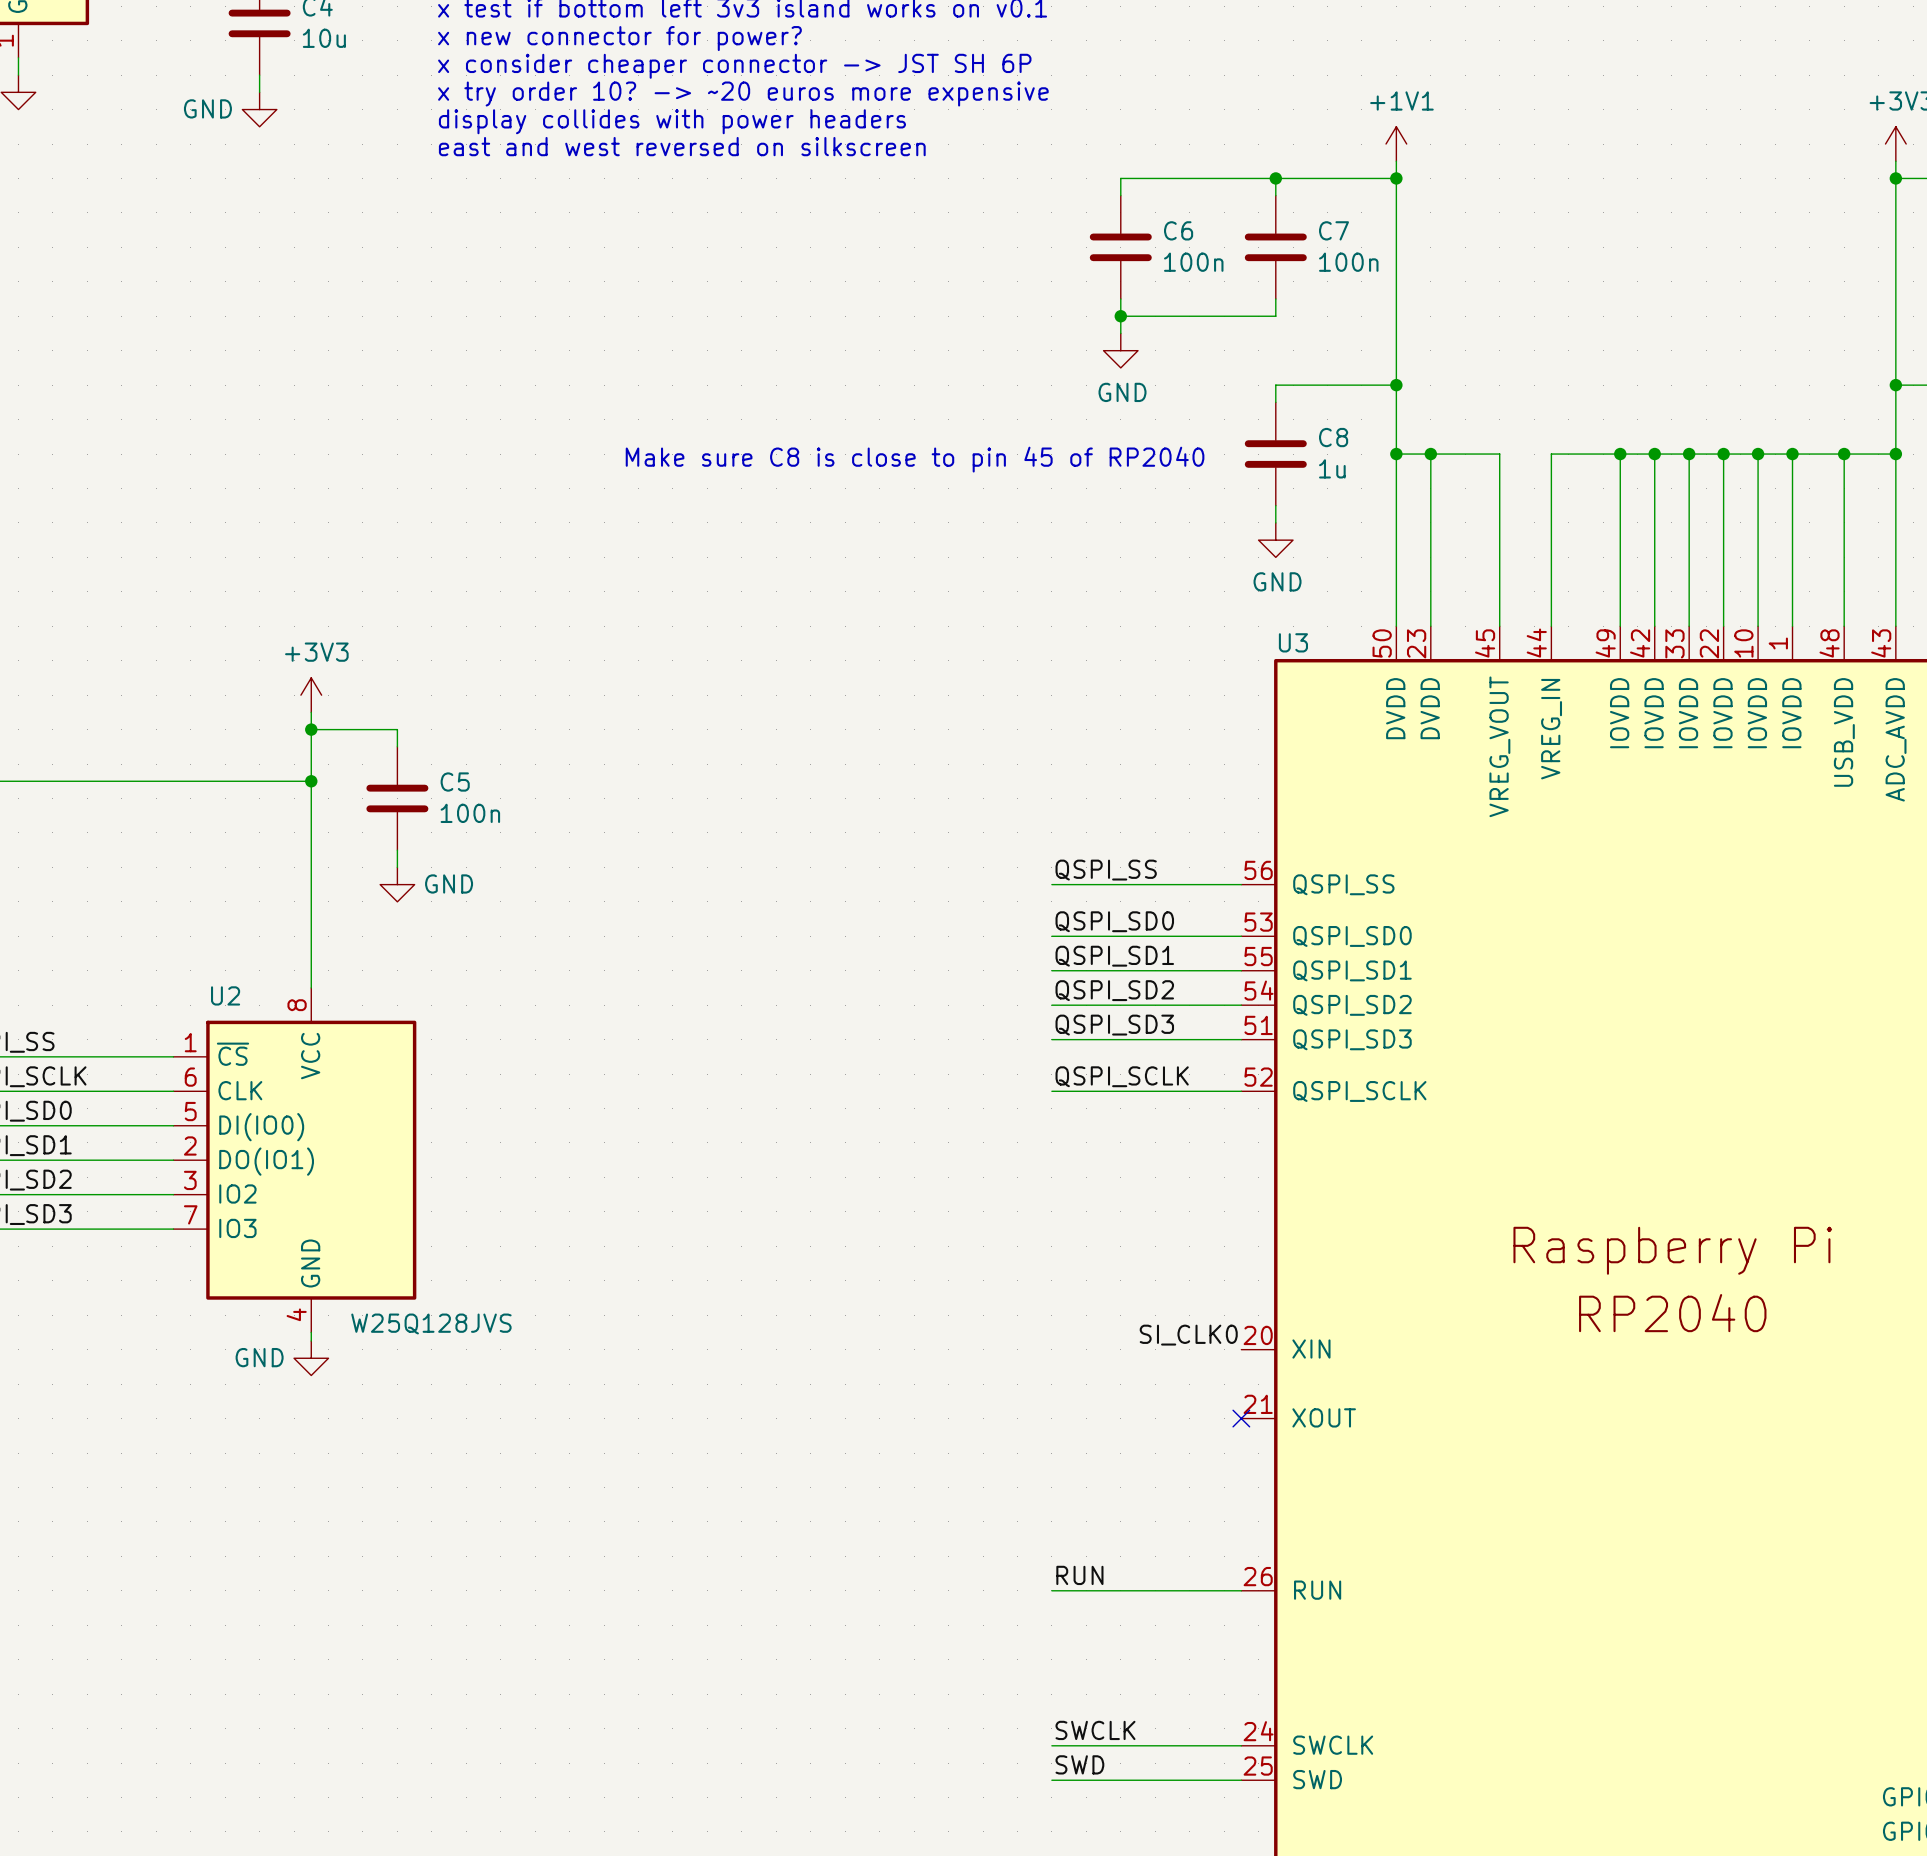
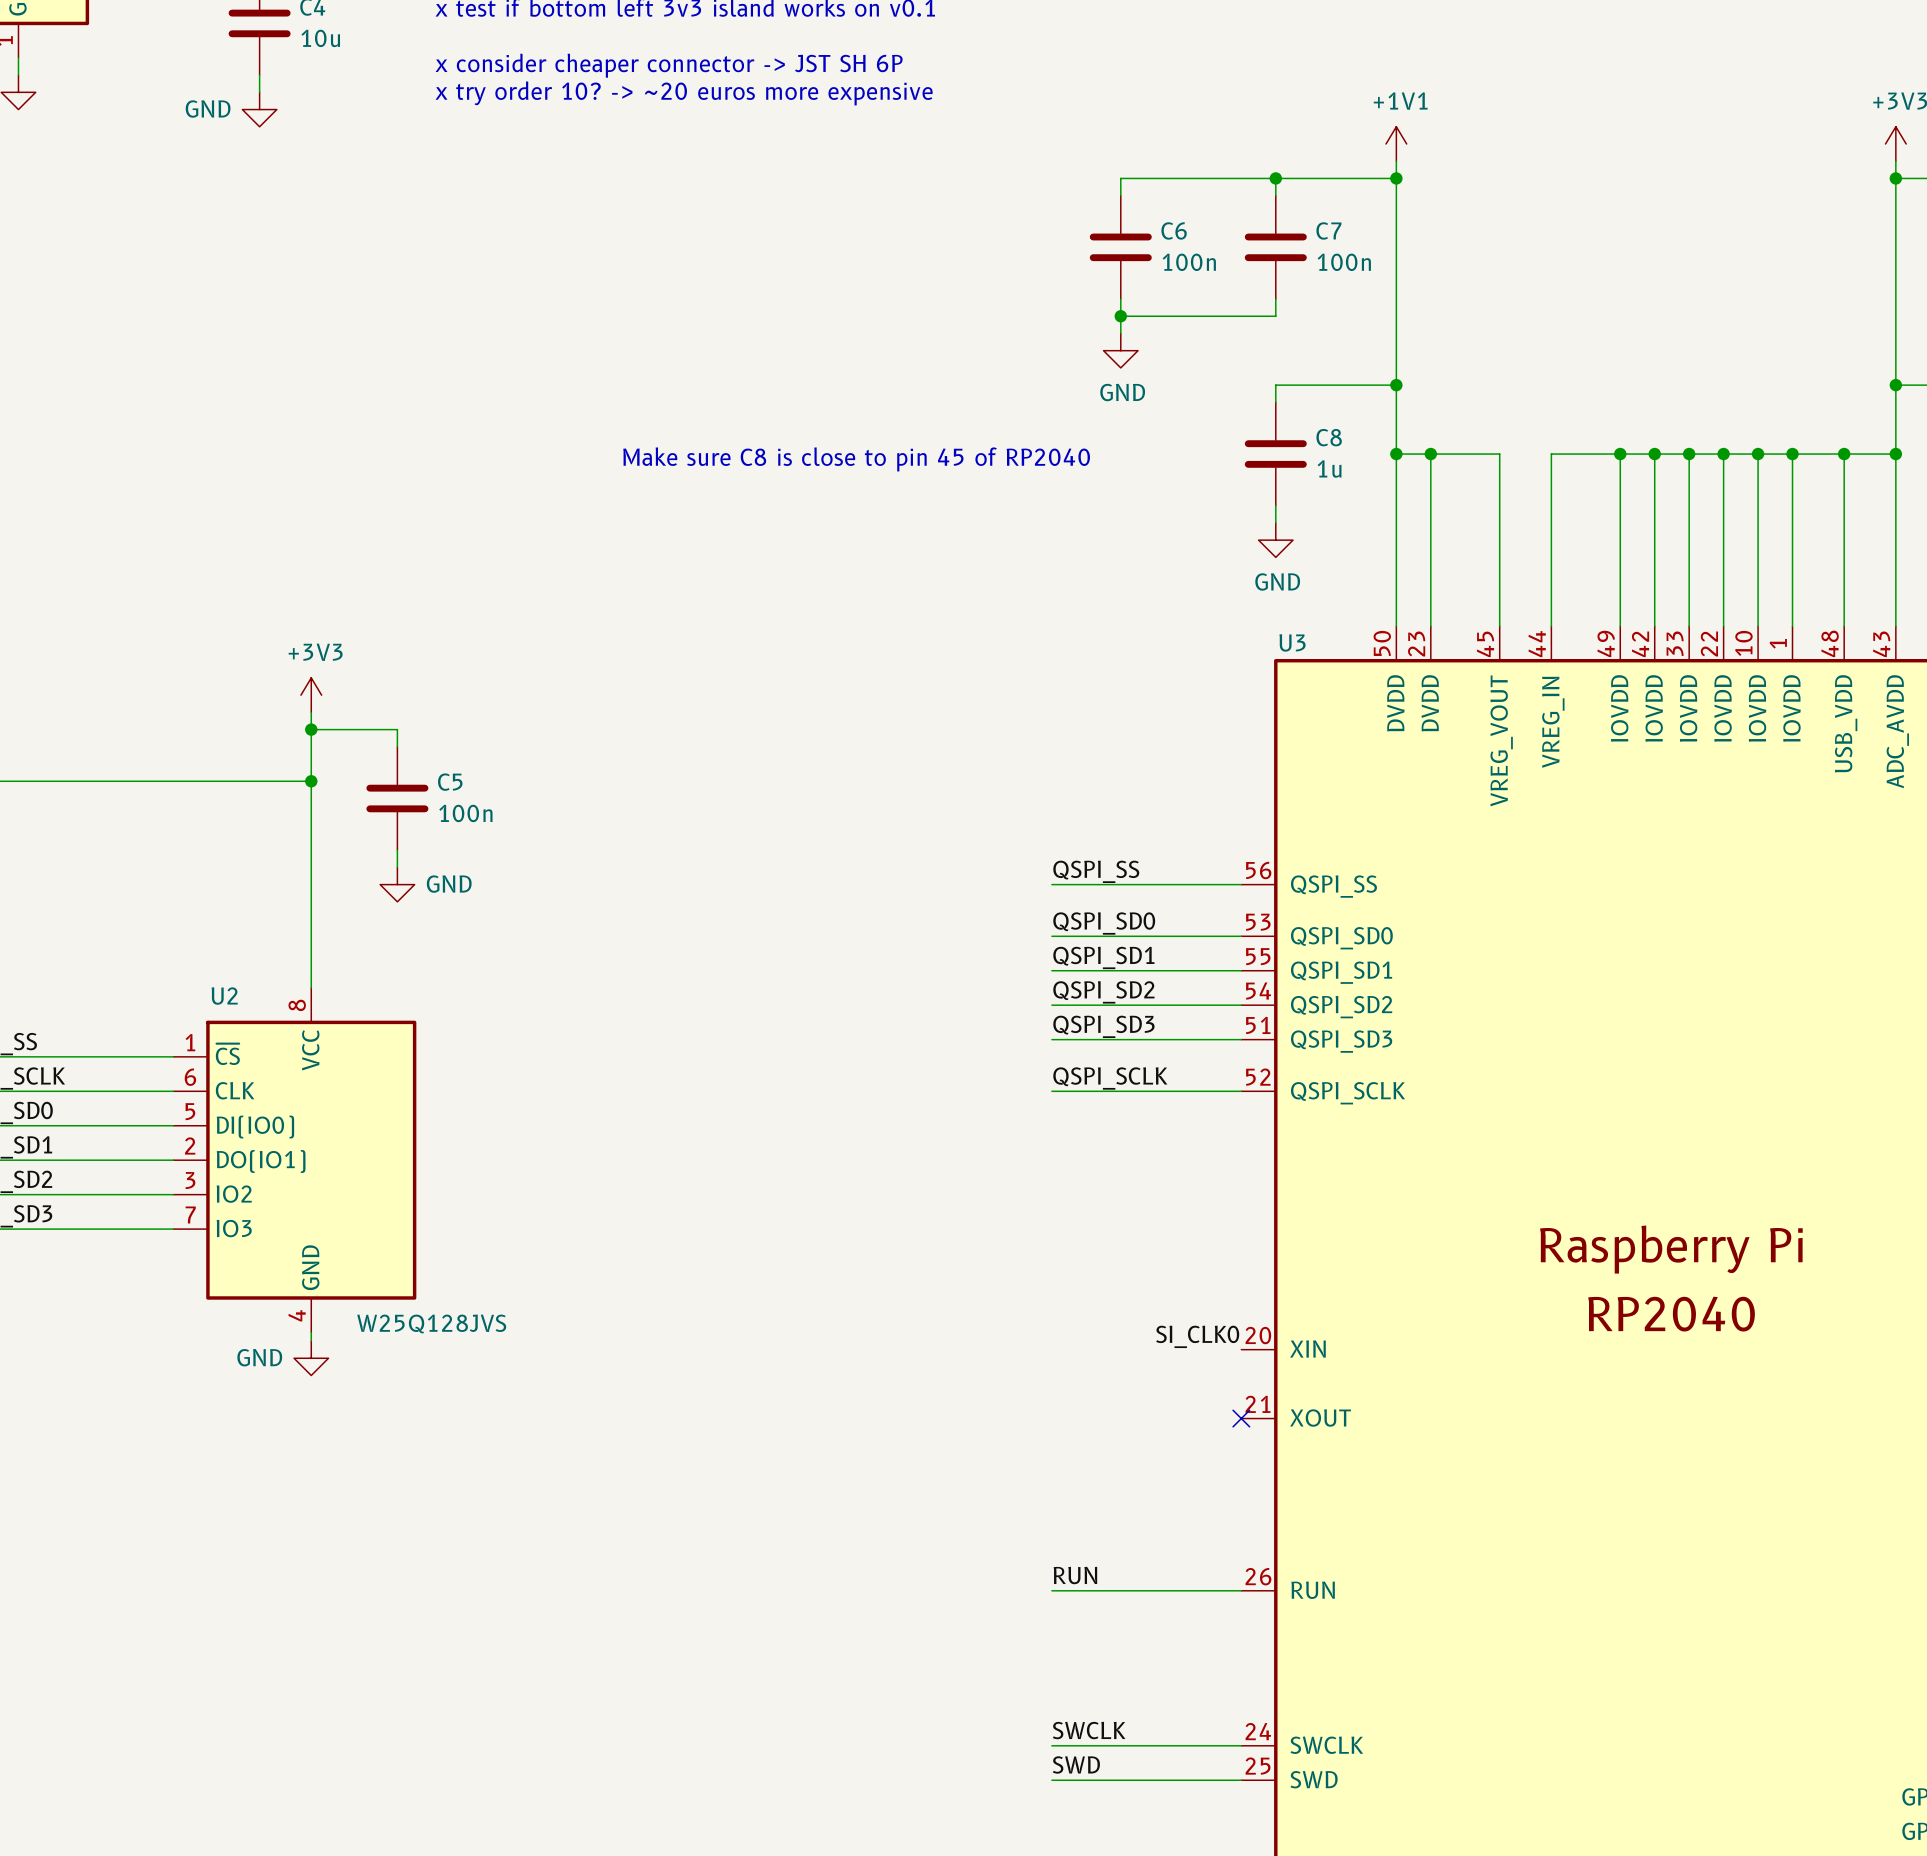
text: x new connector for power? (619, 38) -> none
text: display collides with power headers (672, 121) -> none
text: east and west reversed on silkscreen (682, 146) -> none

